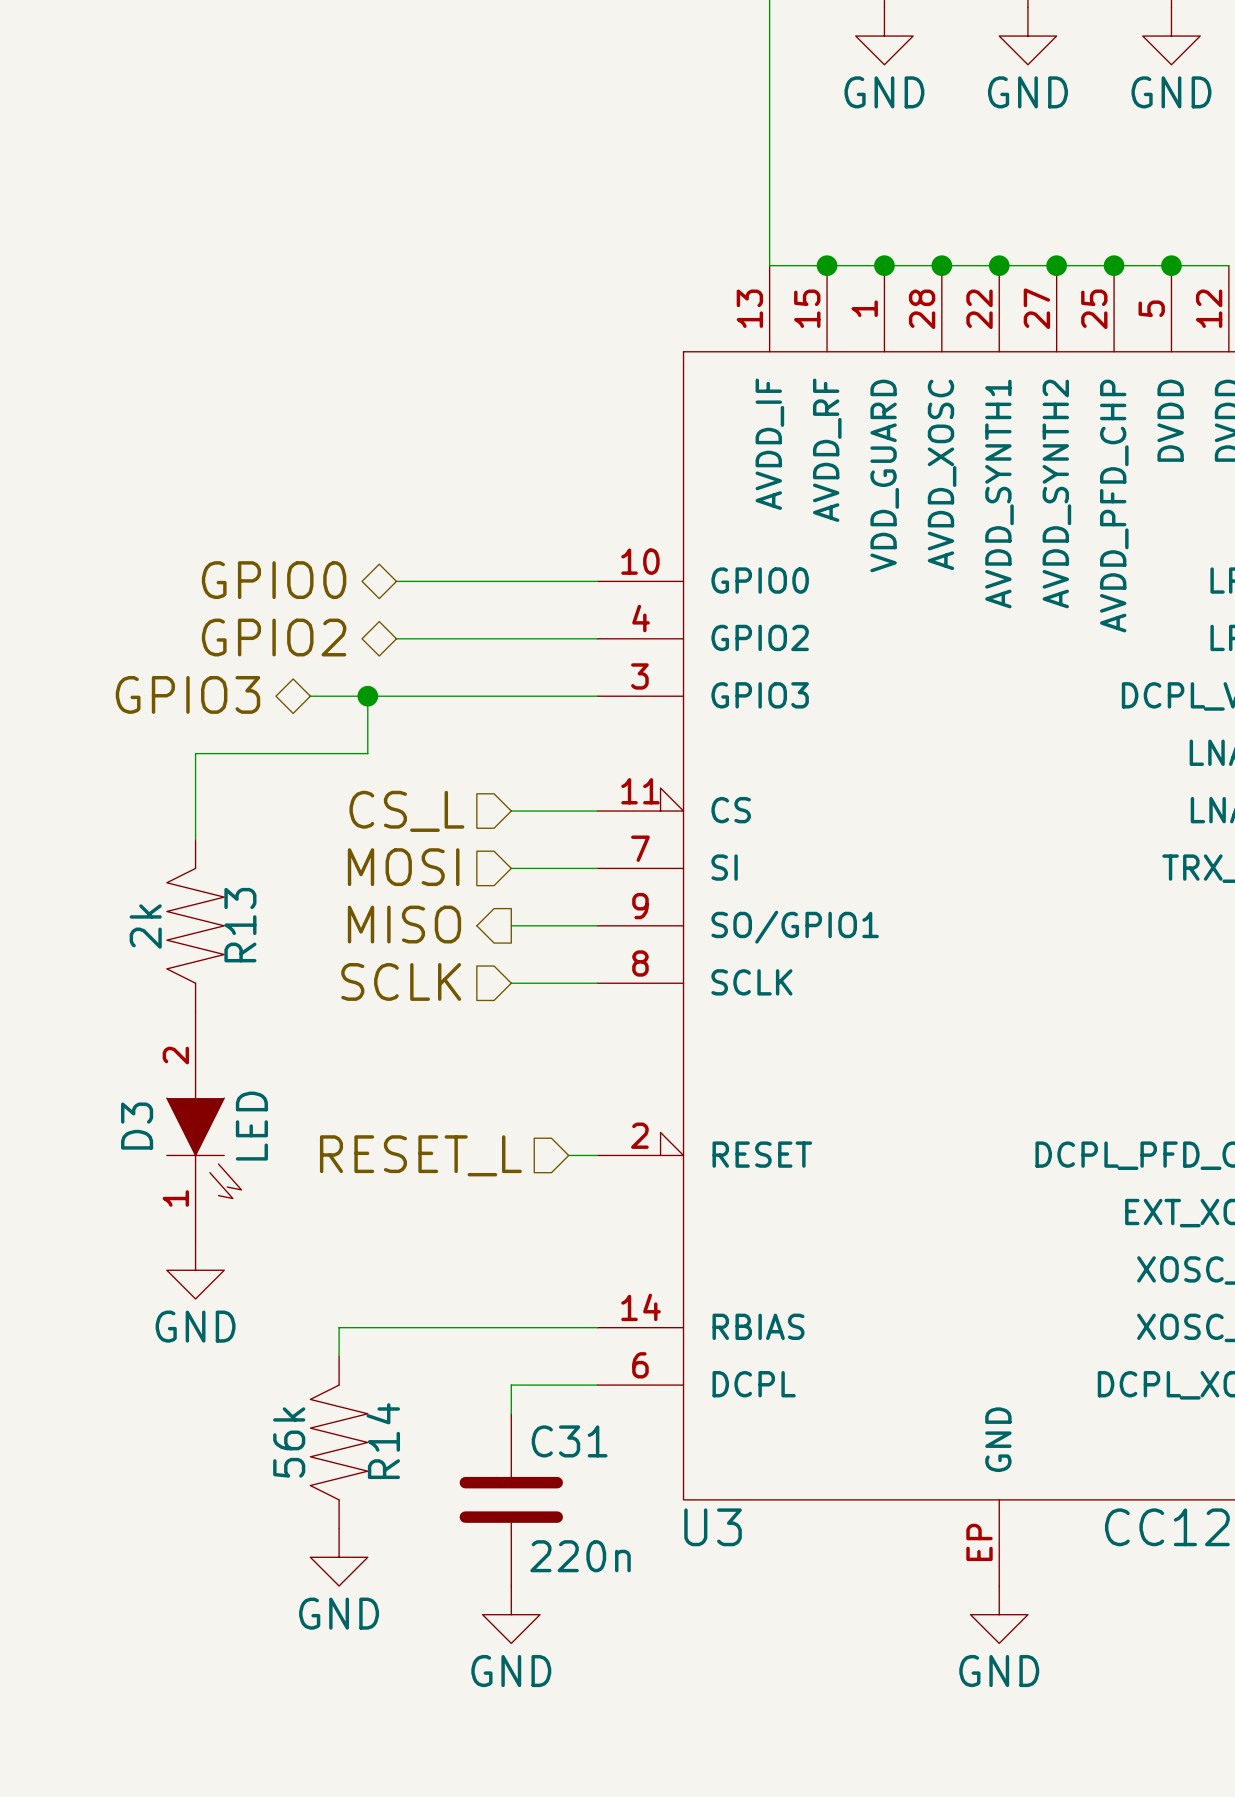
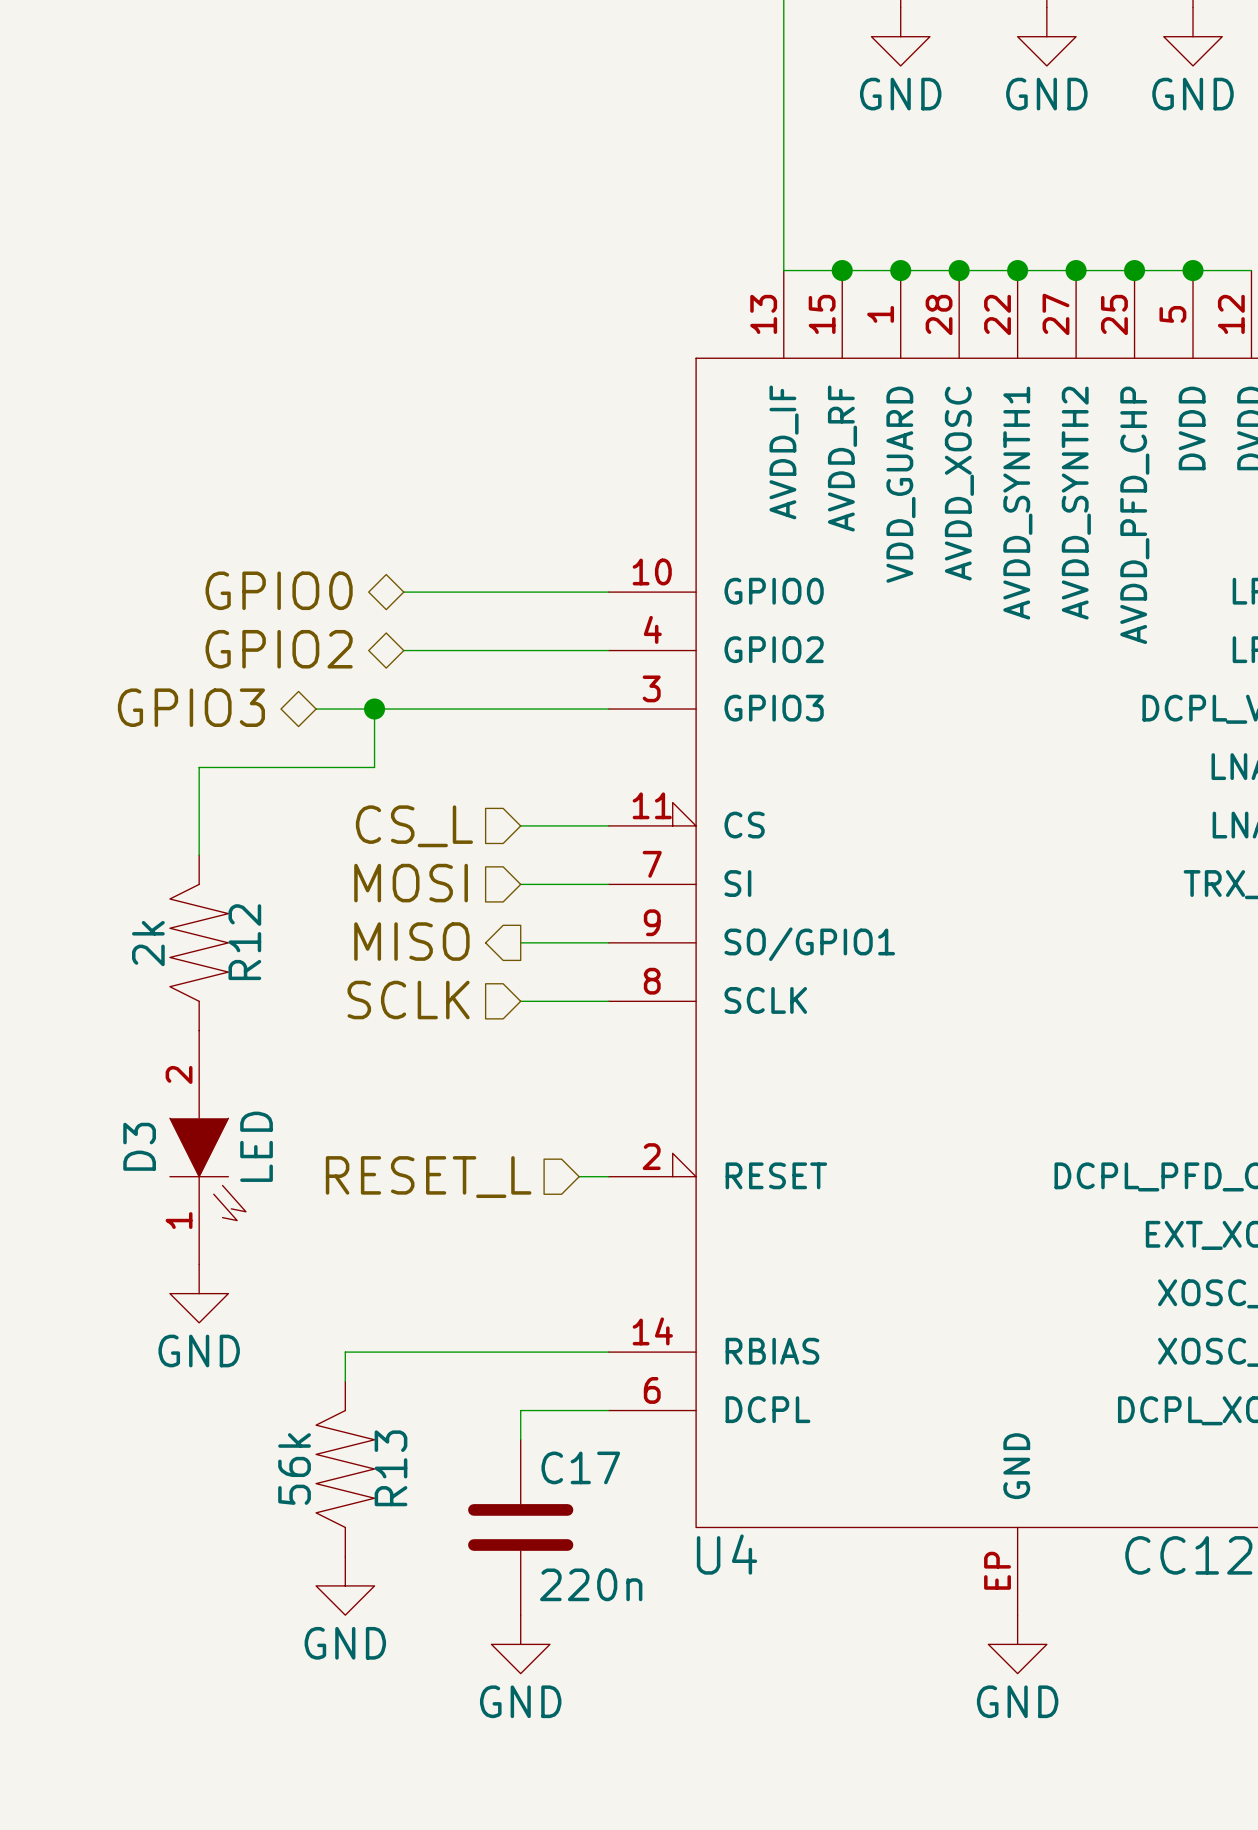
R13 name: R13 (240, 925) -> R12 (244, 942)
R14 name: R14 (383, 1441) -> R13 (390, 1468)
C31 name: C31 (569, 1441) -> C17 (580, 1467)
U3 name: U3 (713, 1527) -> U4 (726, 1554)

